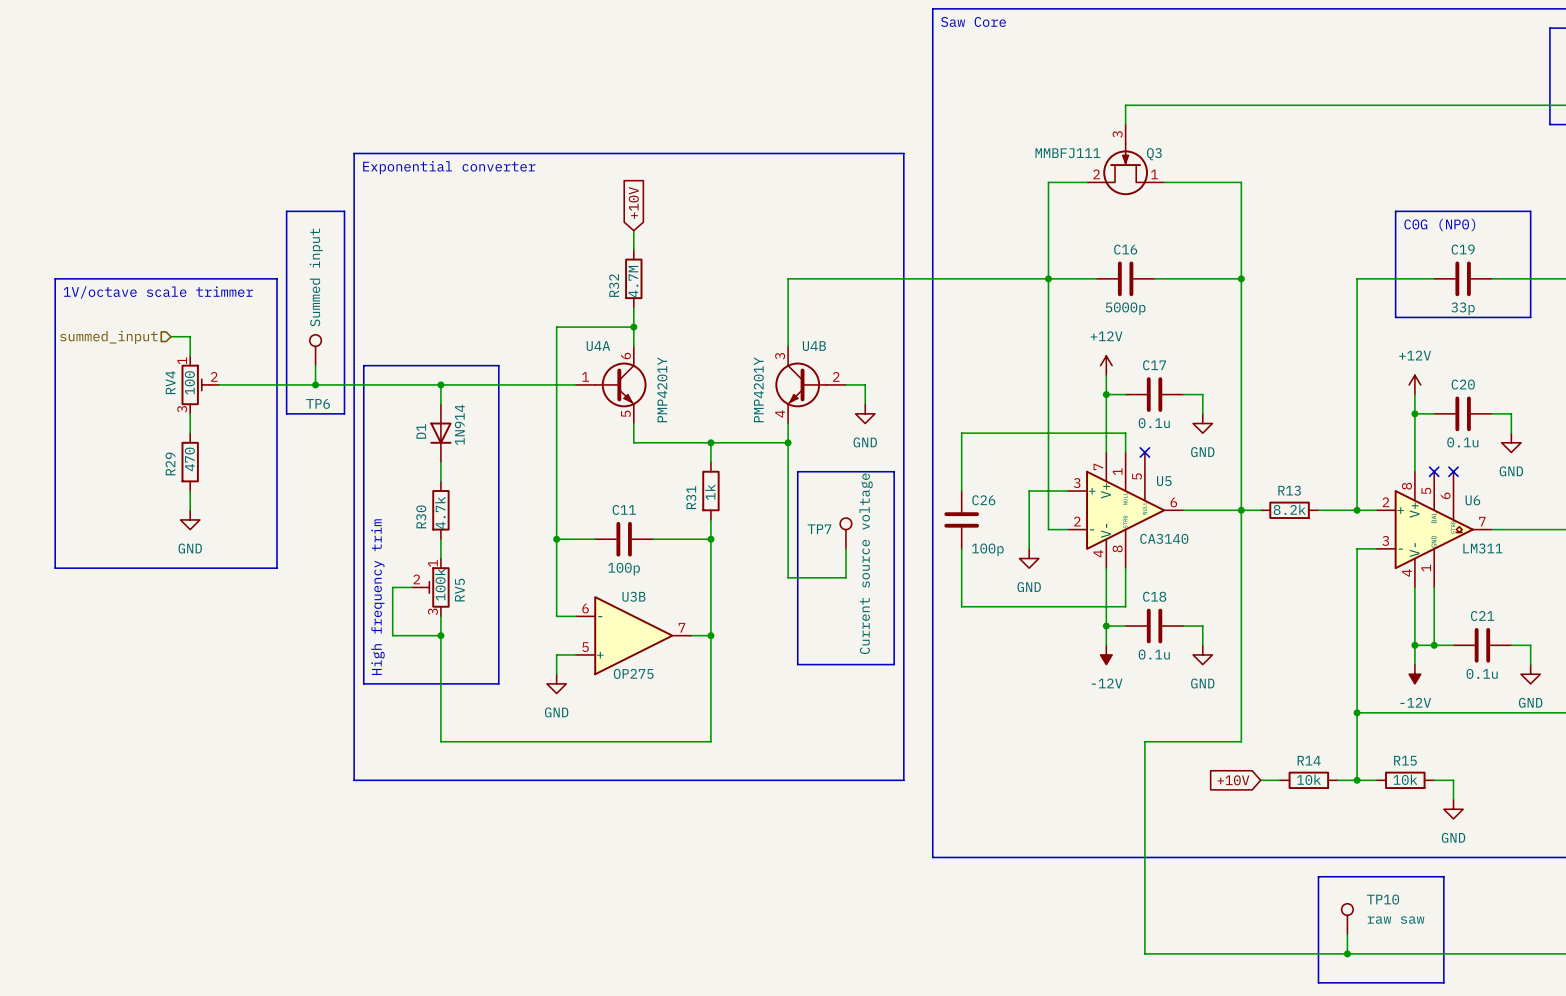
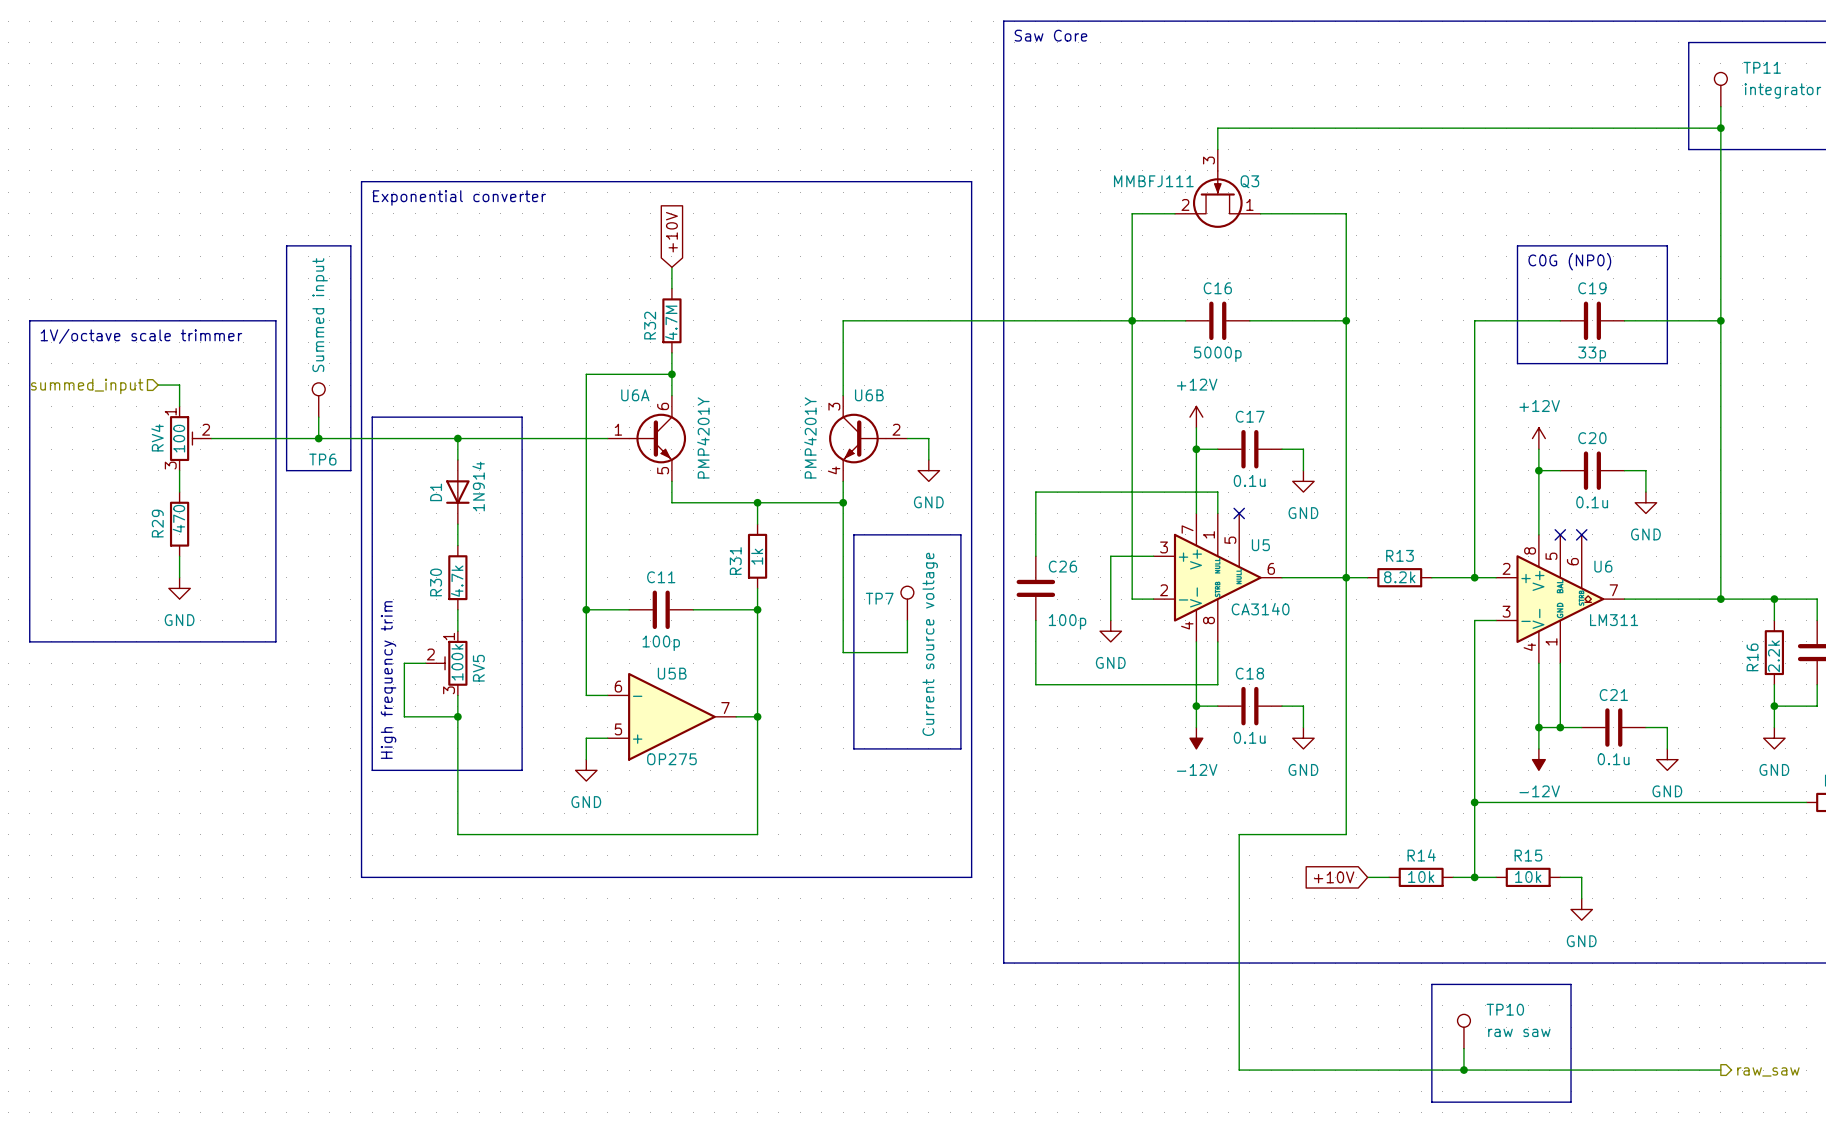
U4A name: U4A (598, 346) -> U6A (635, 395)
U4B name: U4B (814, 346) -> U6B (869, 395)
U3B name: U3B (633, 596) -> U5B (672, 673)

